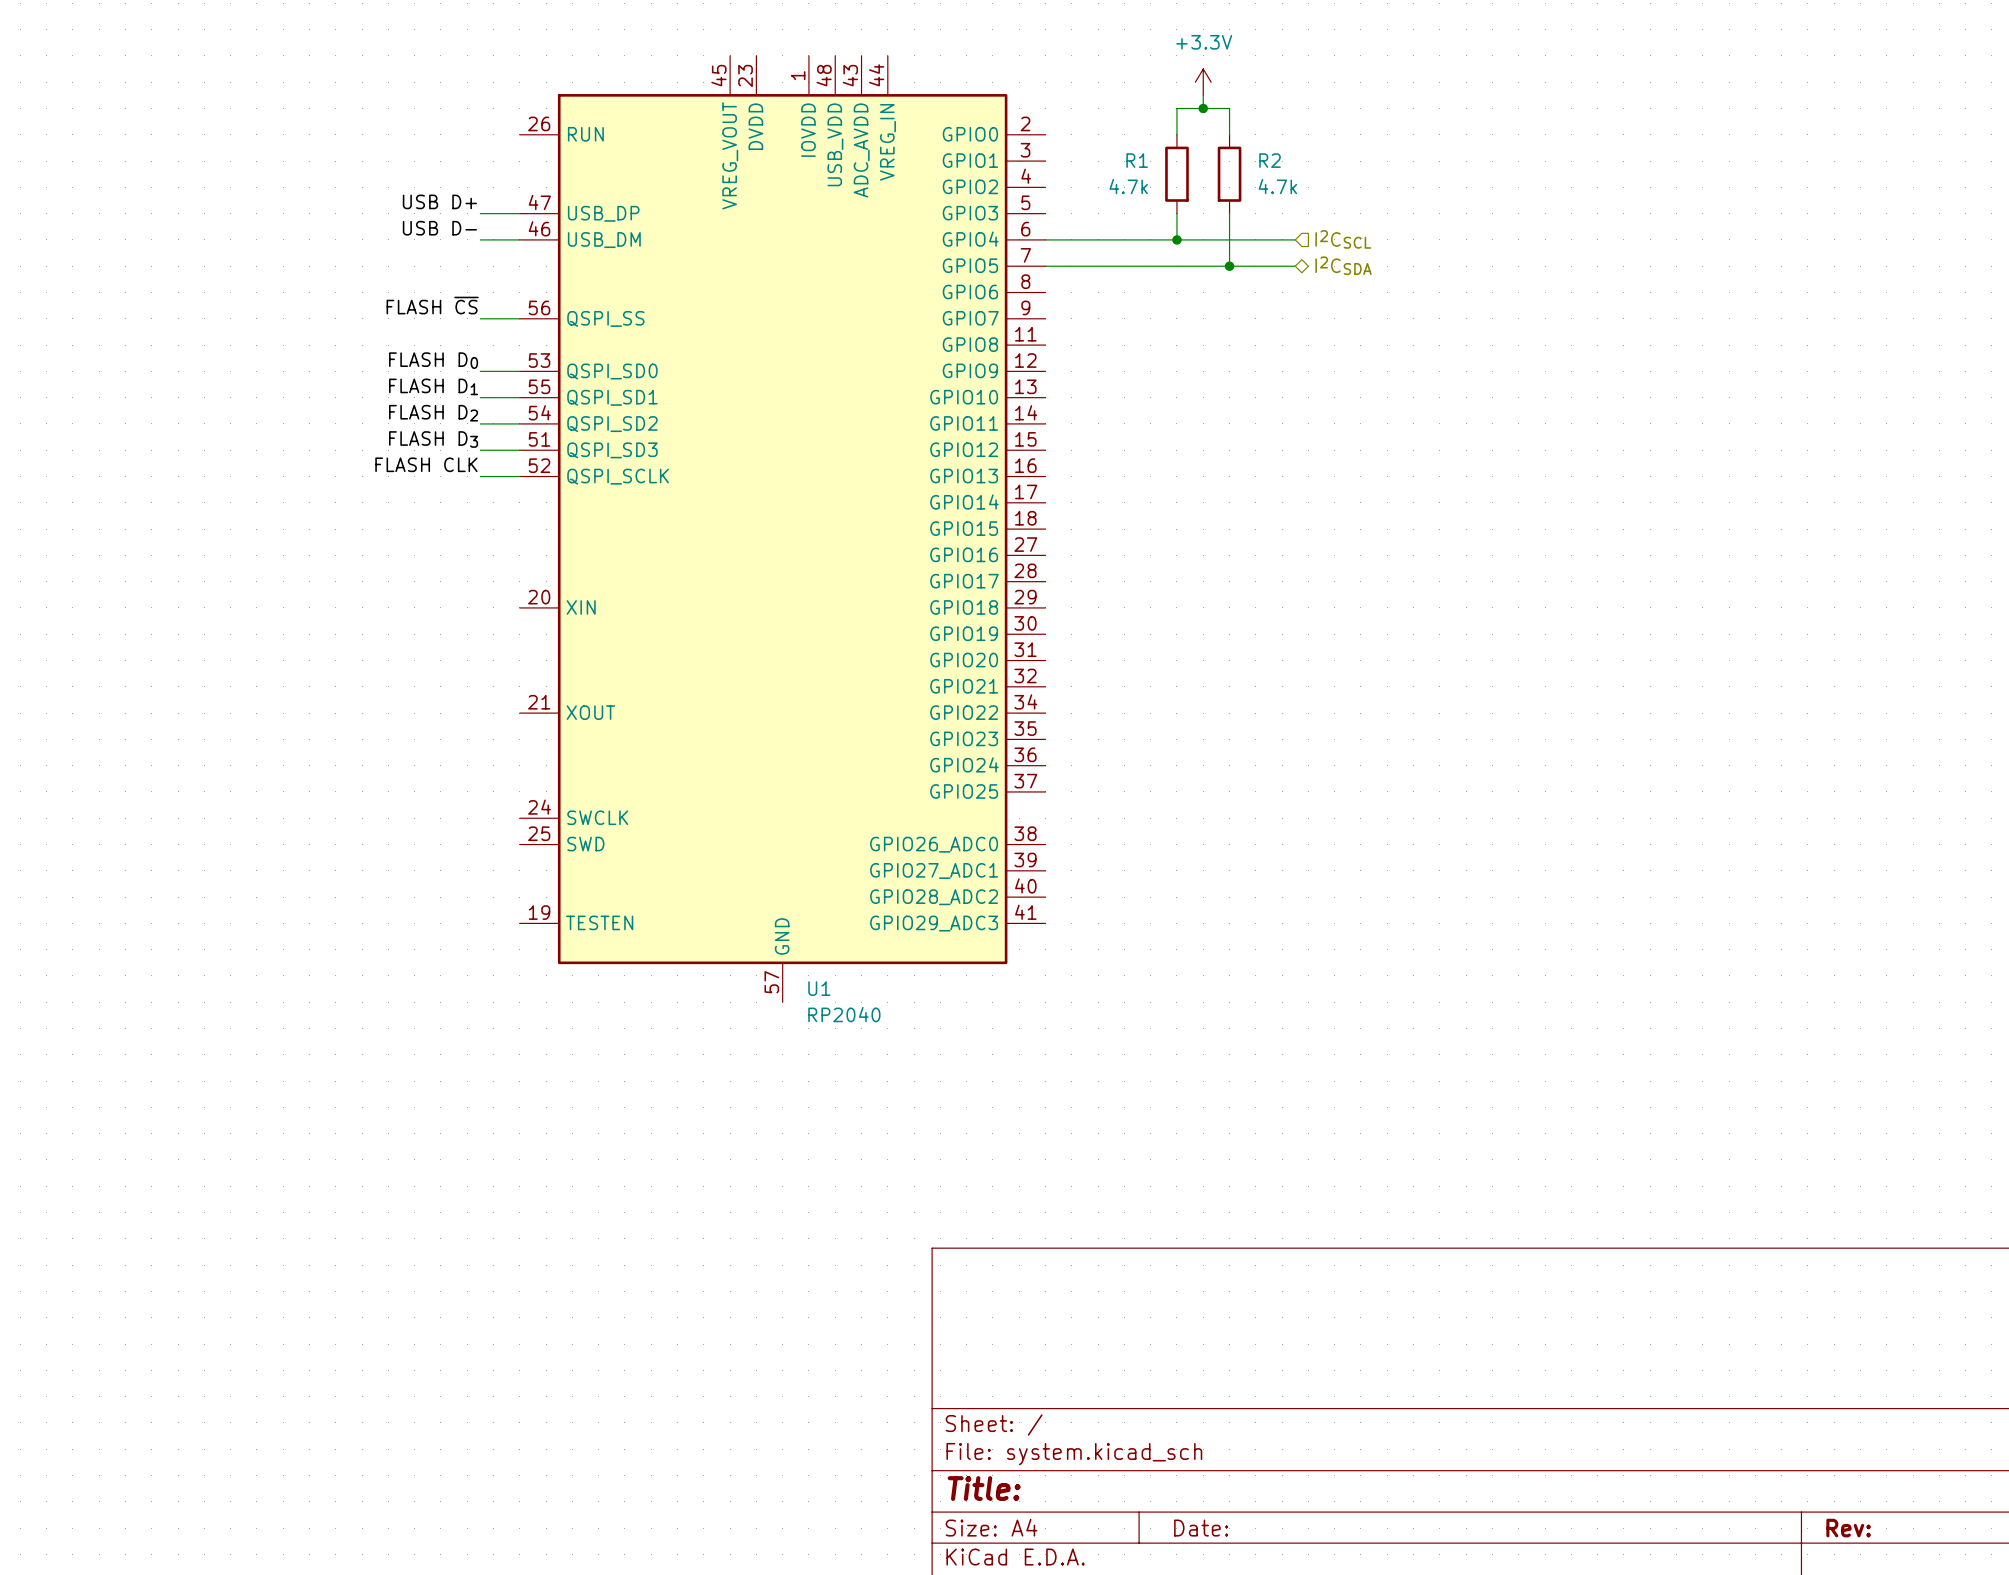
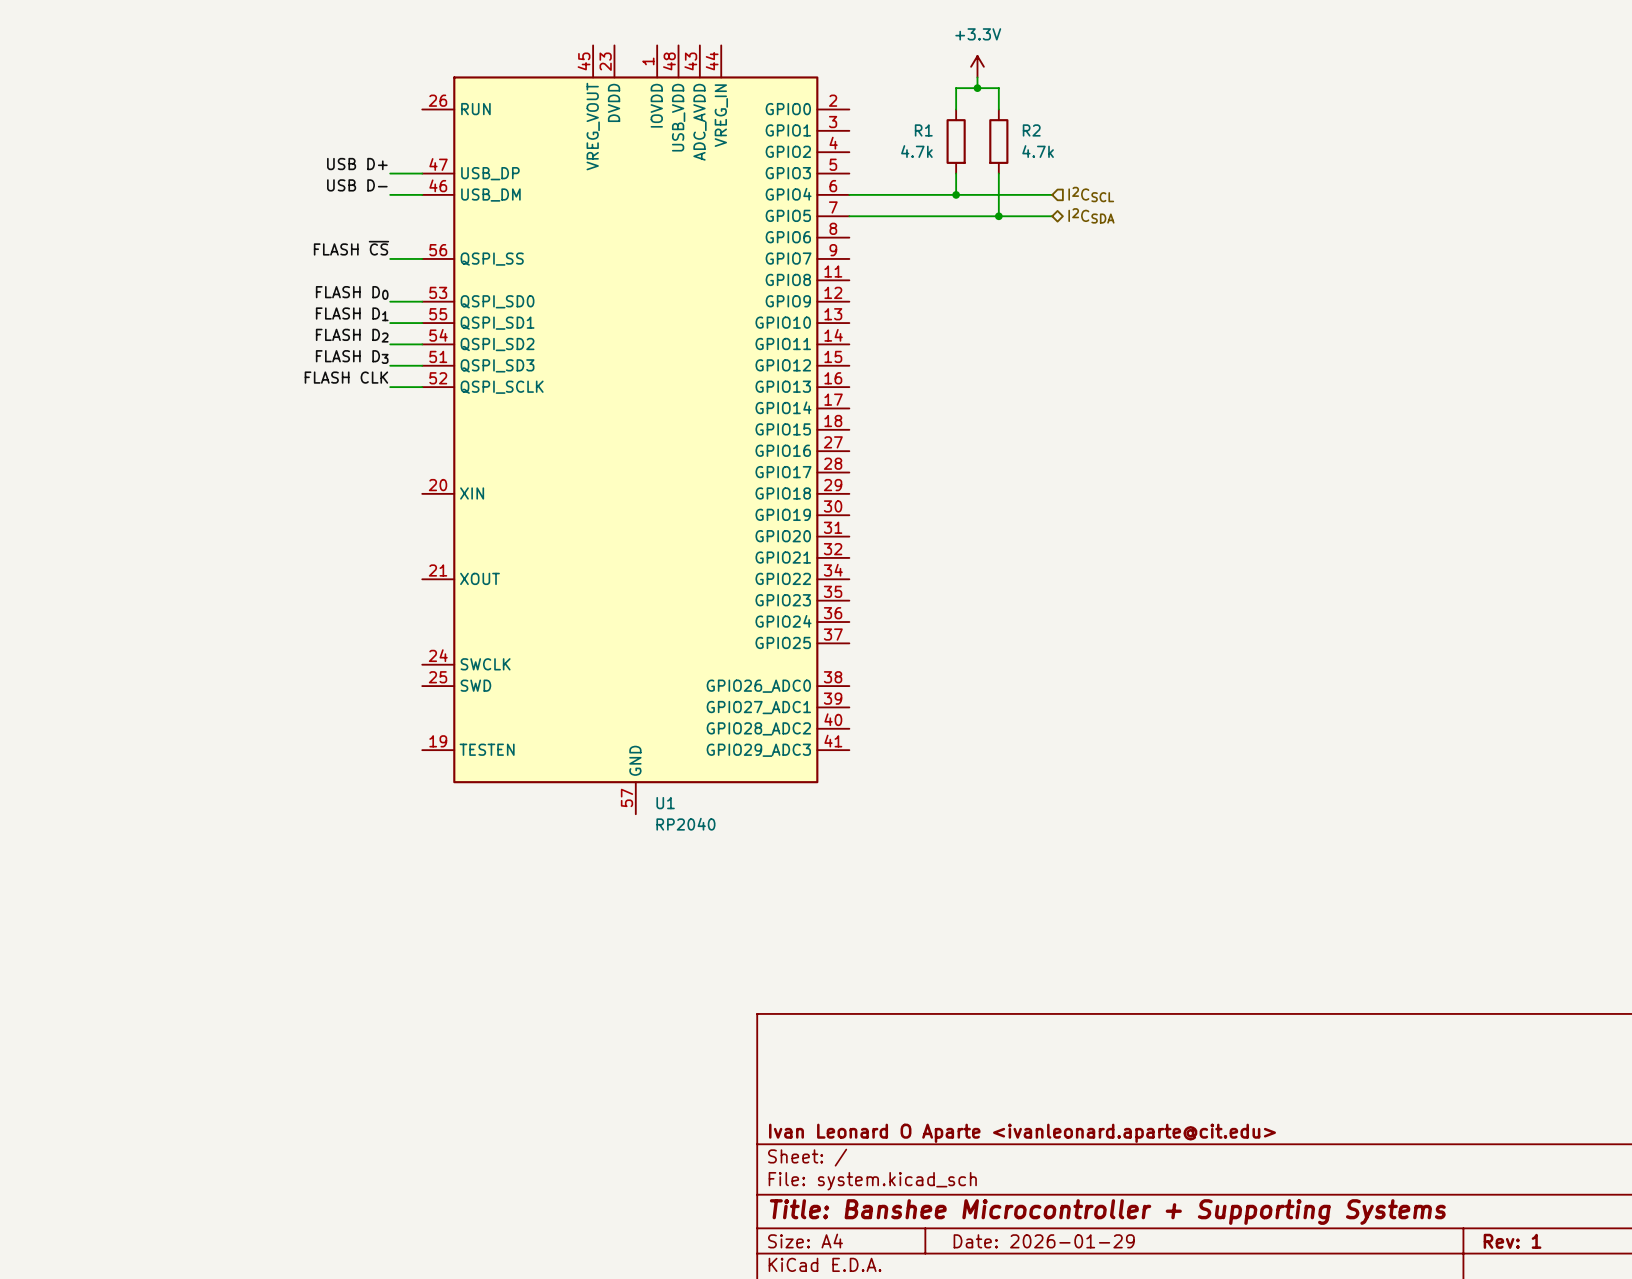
title block: none -> Ivan Leonard O Aparte <ivanleonard.aparte@cit.edu> (1022, 1133)
title block: Title: (984, 1488) -> Title: Banshee Microcontroller + Supporting Systems (1107, 1212)
title block: Date: (1201, 1528) -> Date: 2026-01-29 (1044, 1241)
title block: Rev: (1848, 1528) -> Rev: 1 (1512, 1241)

